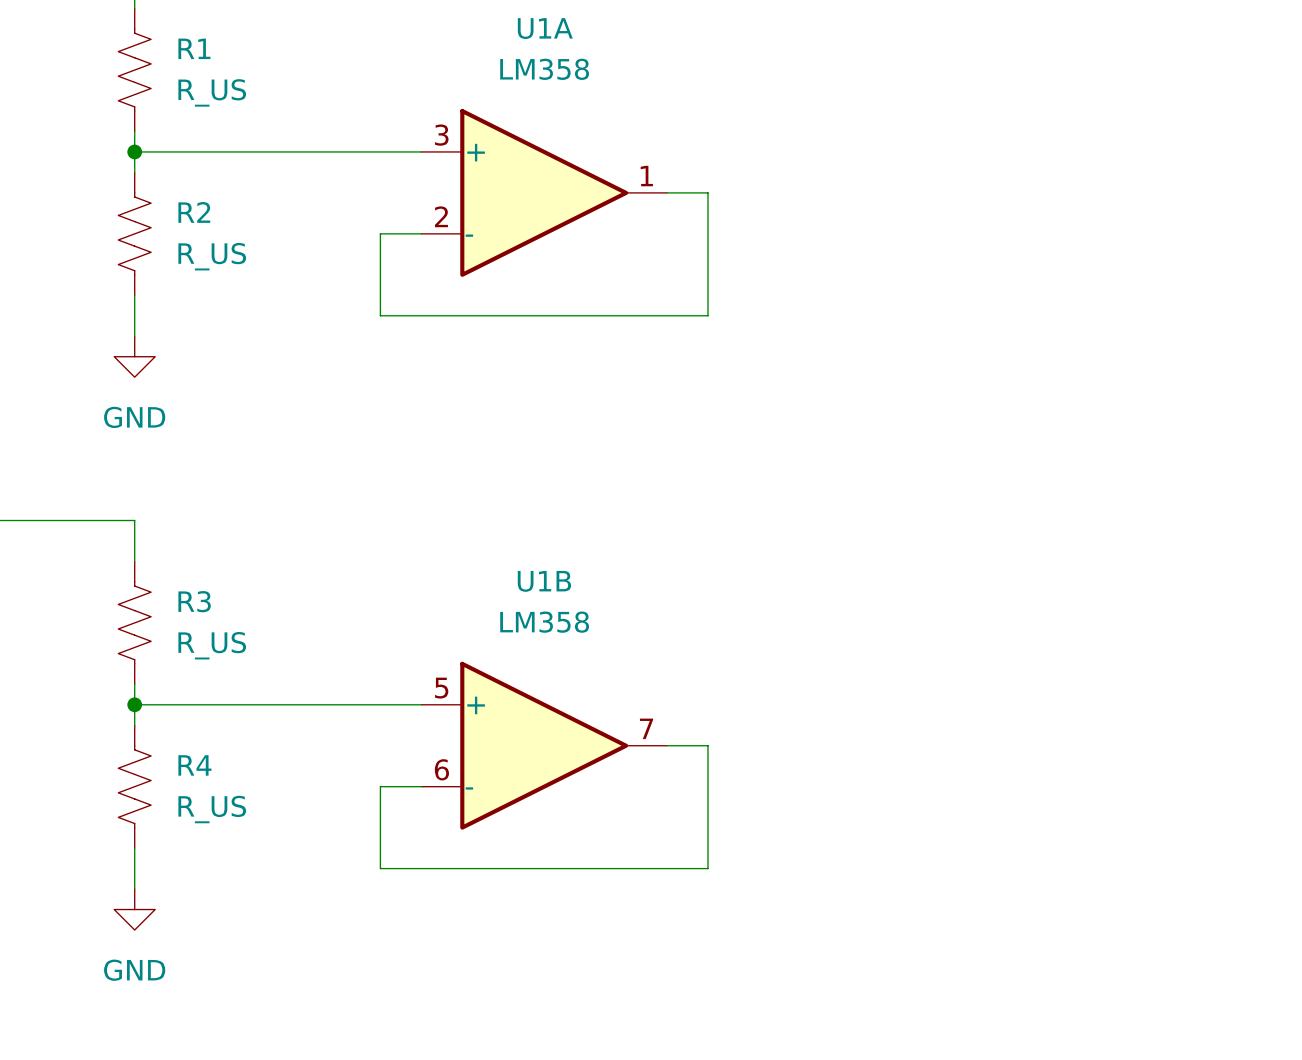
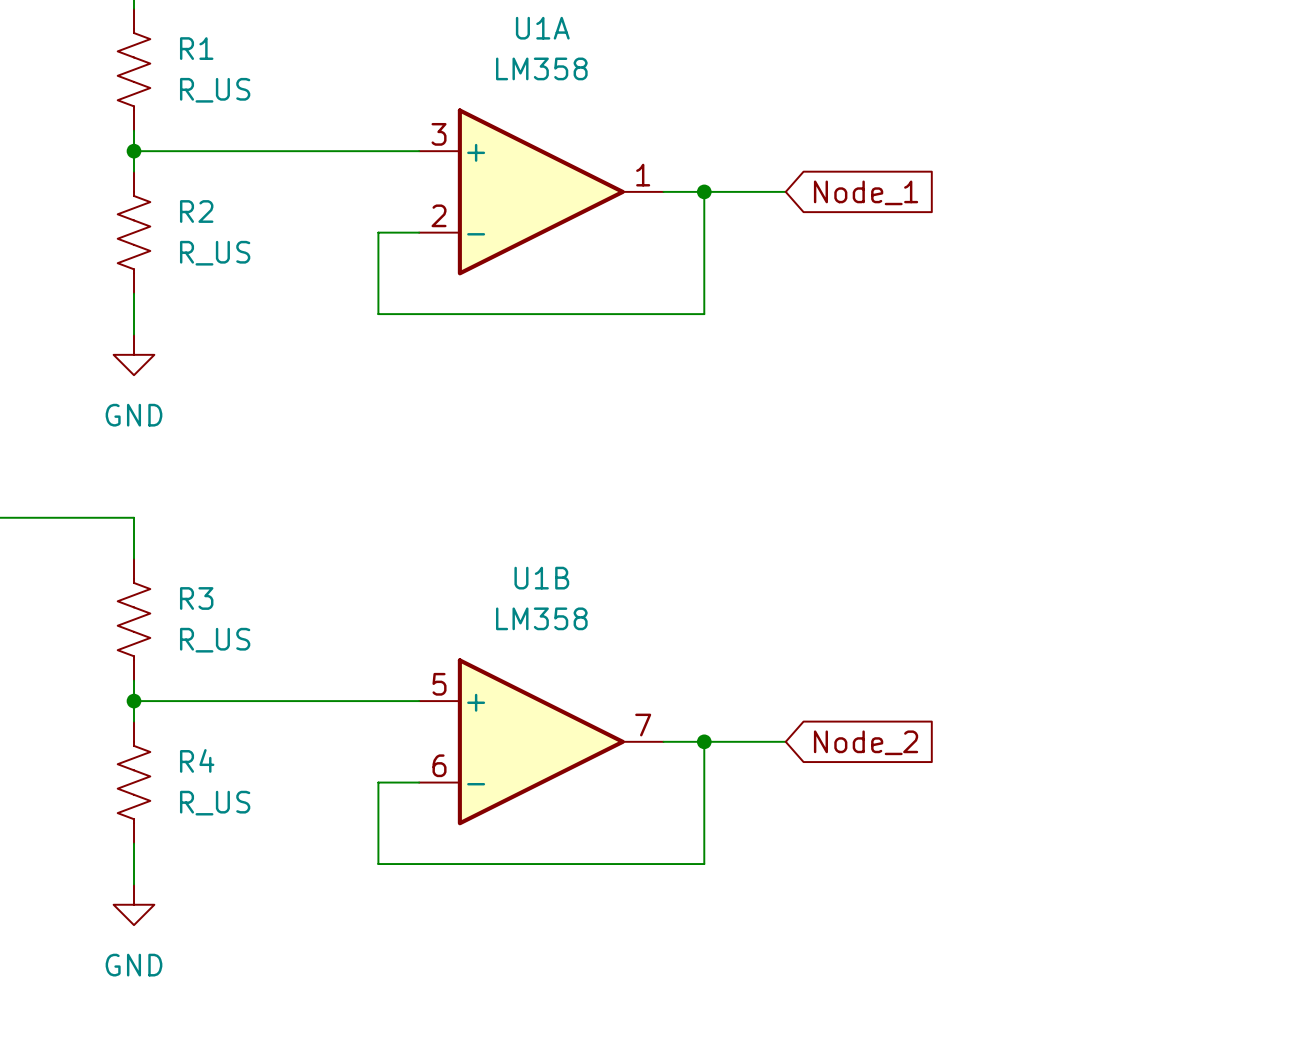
wire: none -> (704, 191) (785, 191)
junction: none -> (704, 191)
global label: none -> Node_1 (866, 192)
wire: none -> (704, 741) (785, 741)
junction: none -> (704, 741)
global label: none -> Node_2 (866, 742)

